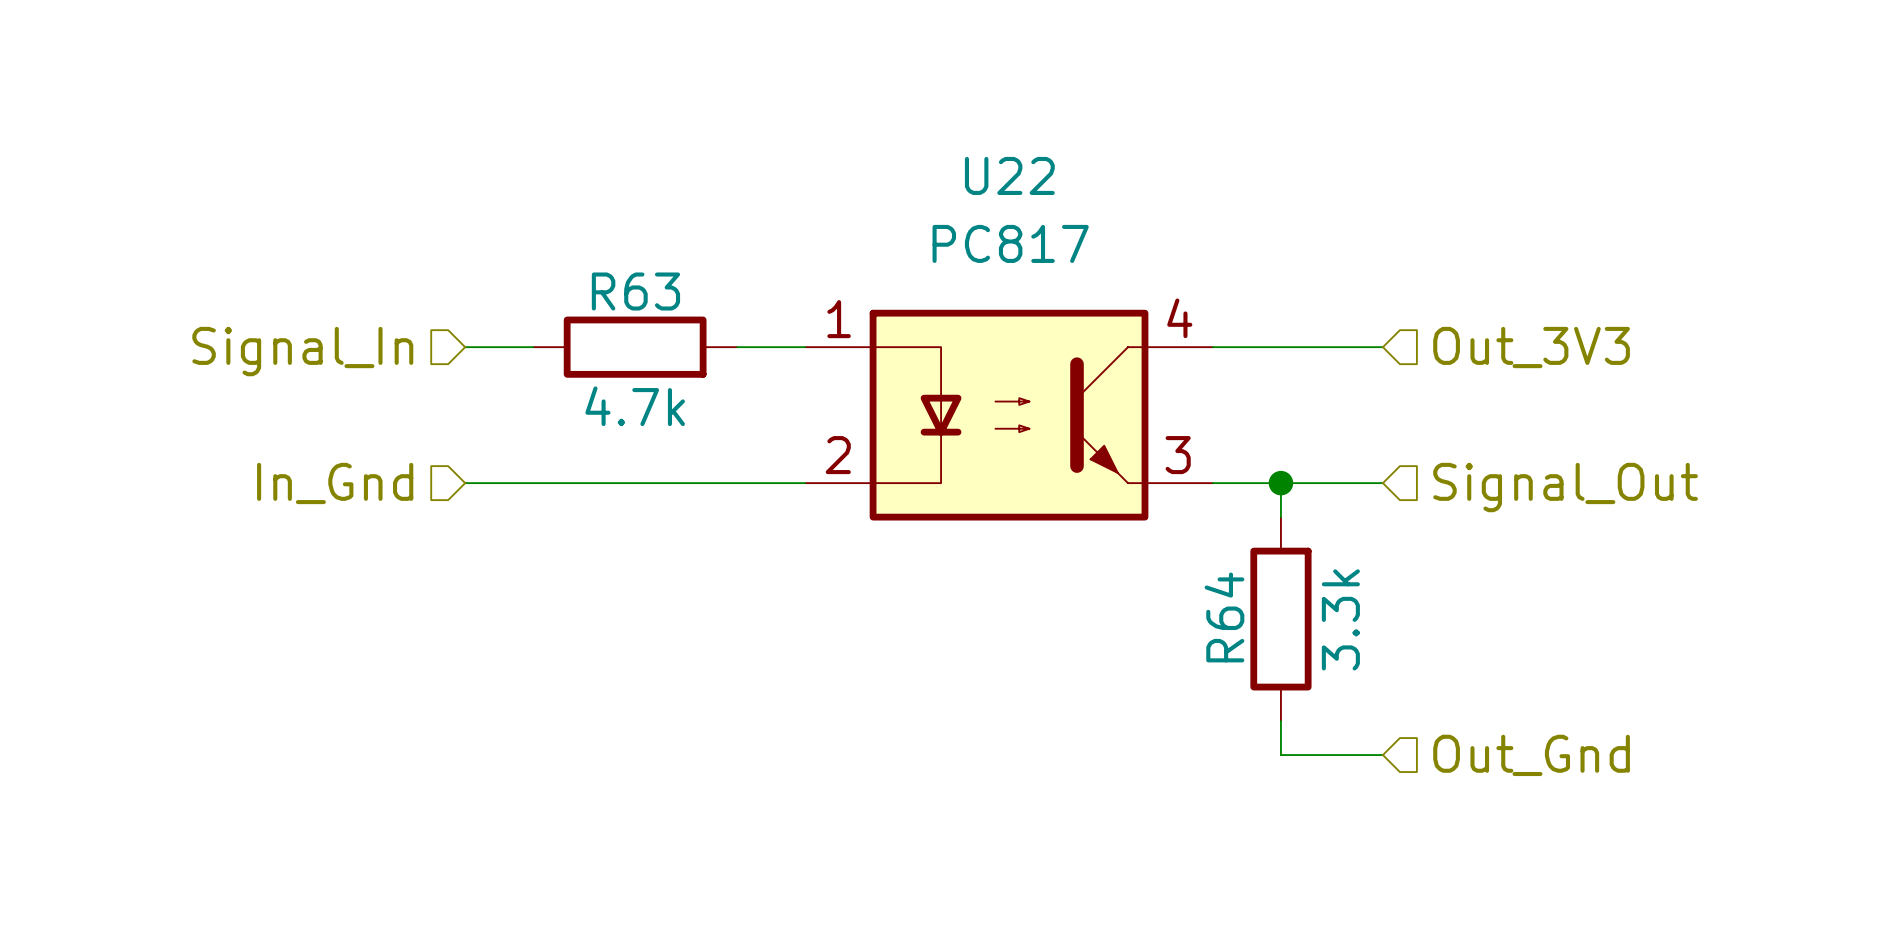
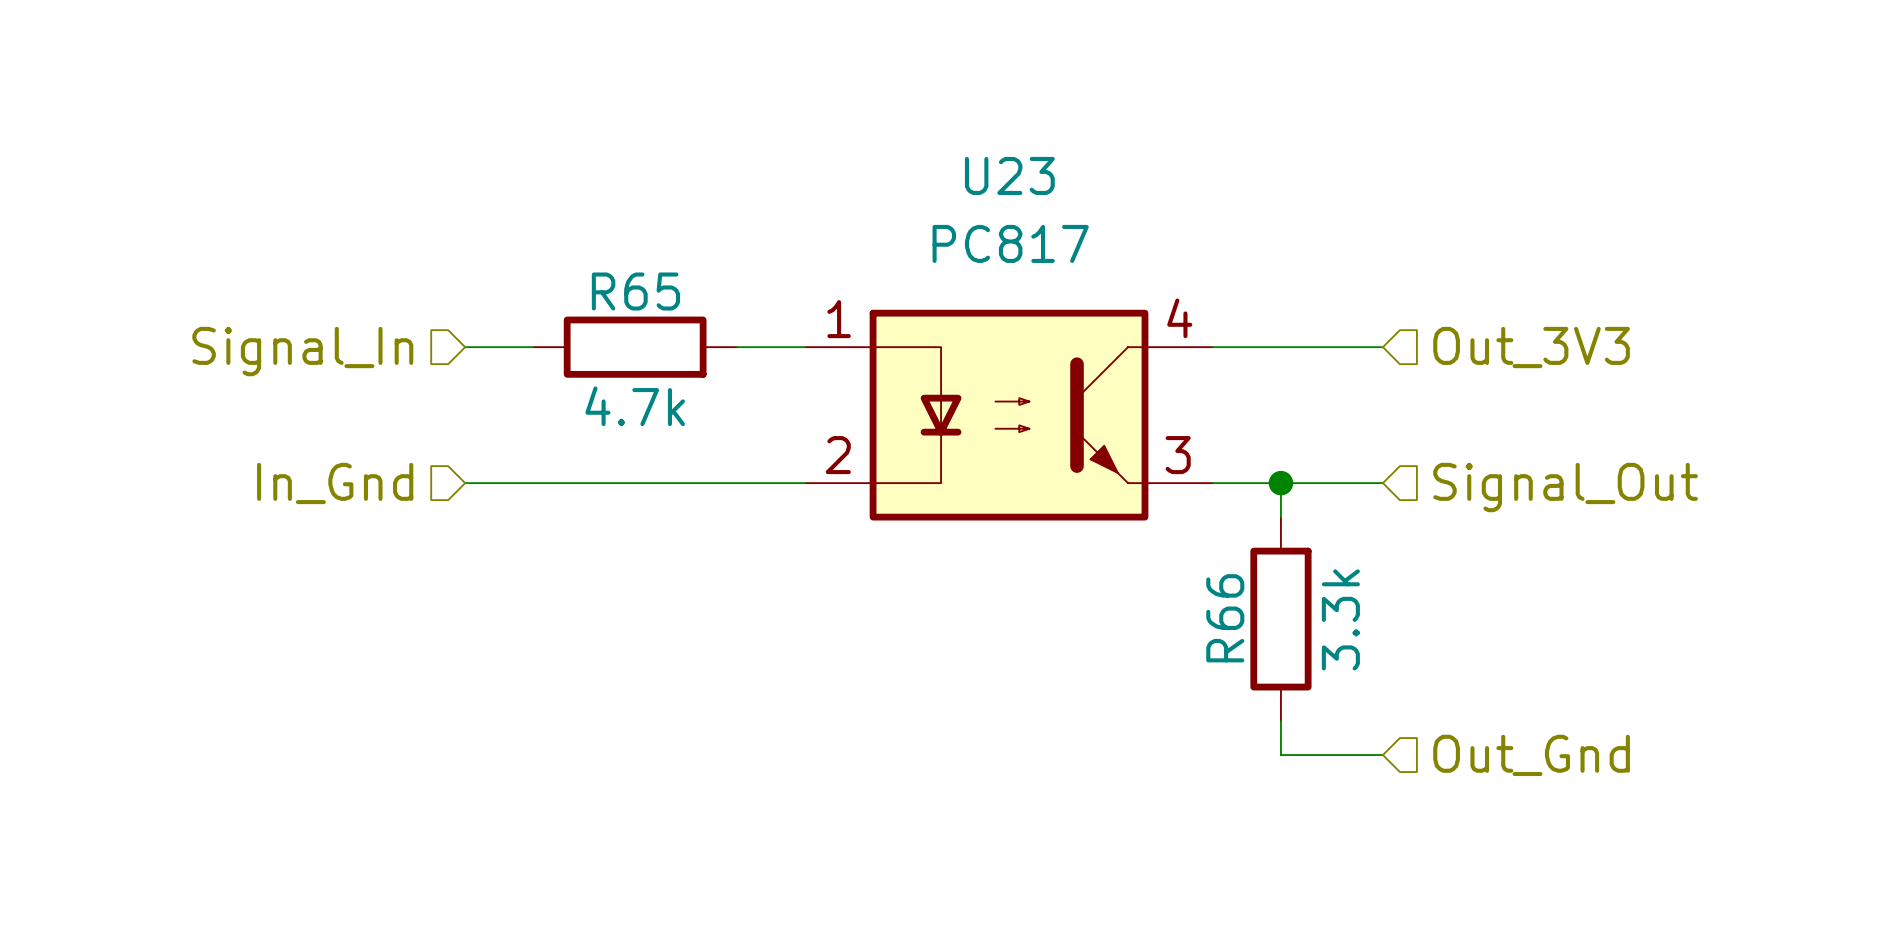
U22 name: U22 (1009, 175) -> U23 (1009, 175)
R63 name: R63 (635, 291) -> R65 (635, 291)
R64 name: R64 (1224, 617) -> R66 (1225, 618)

